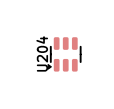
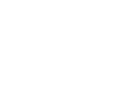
U204: (64, 54) -> none

